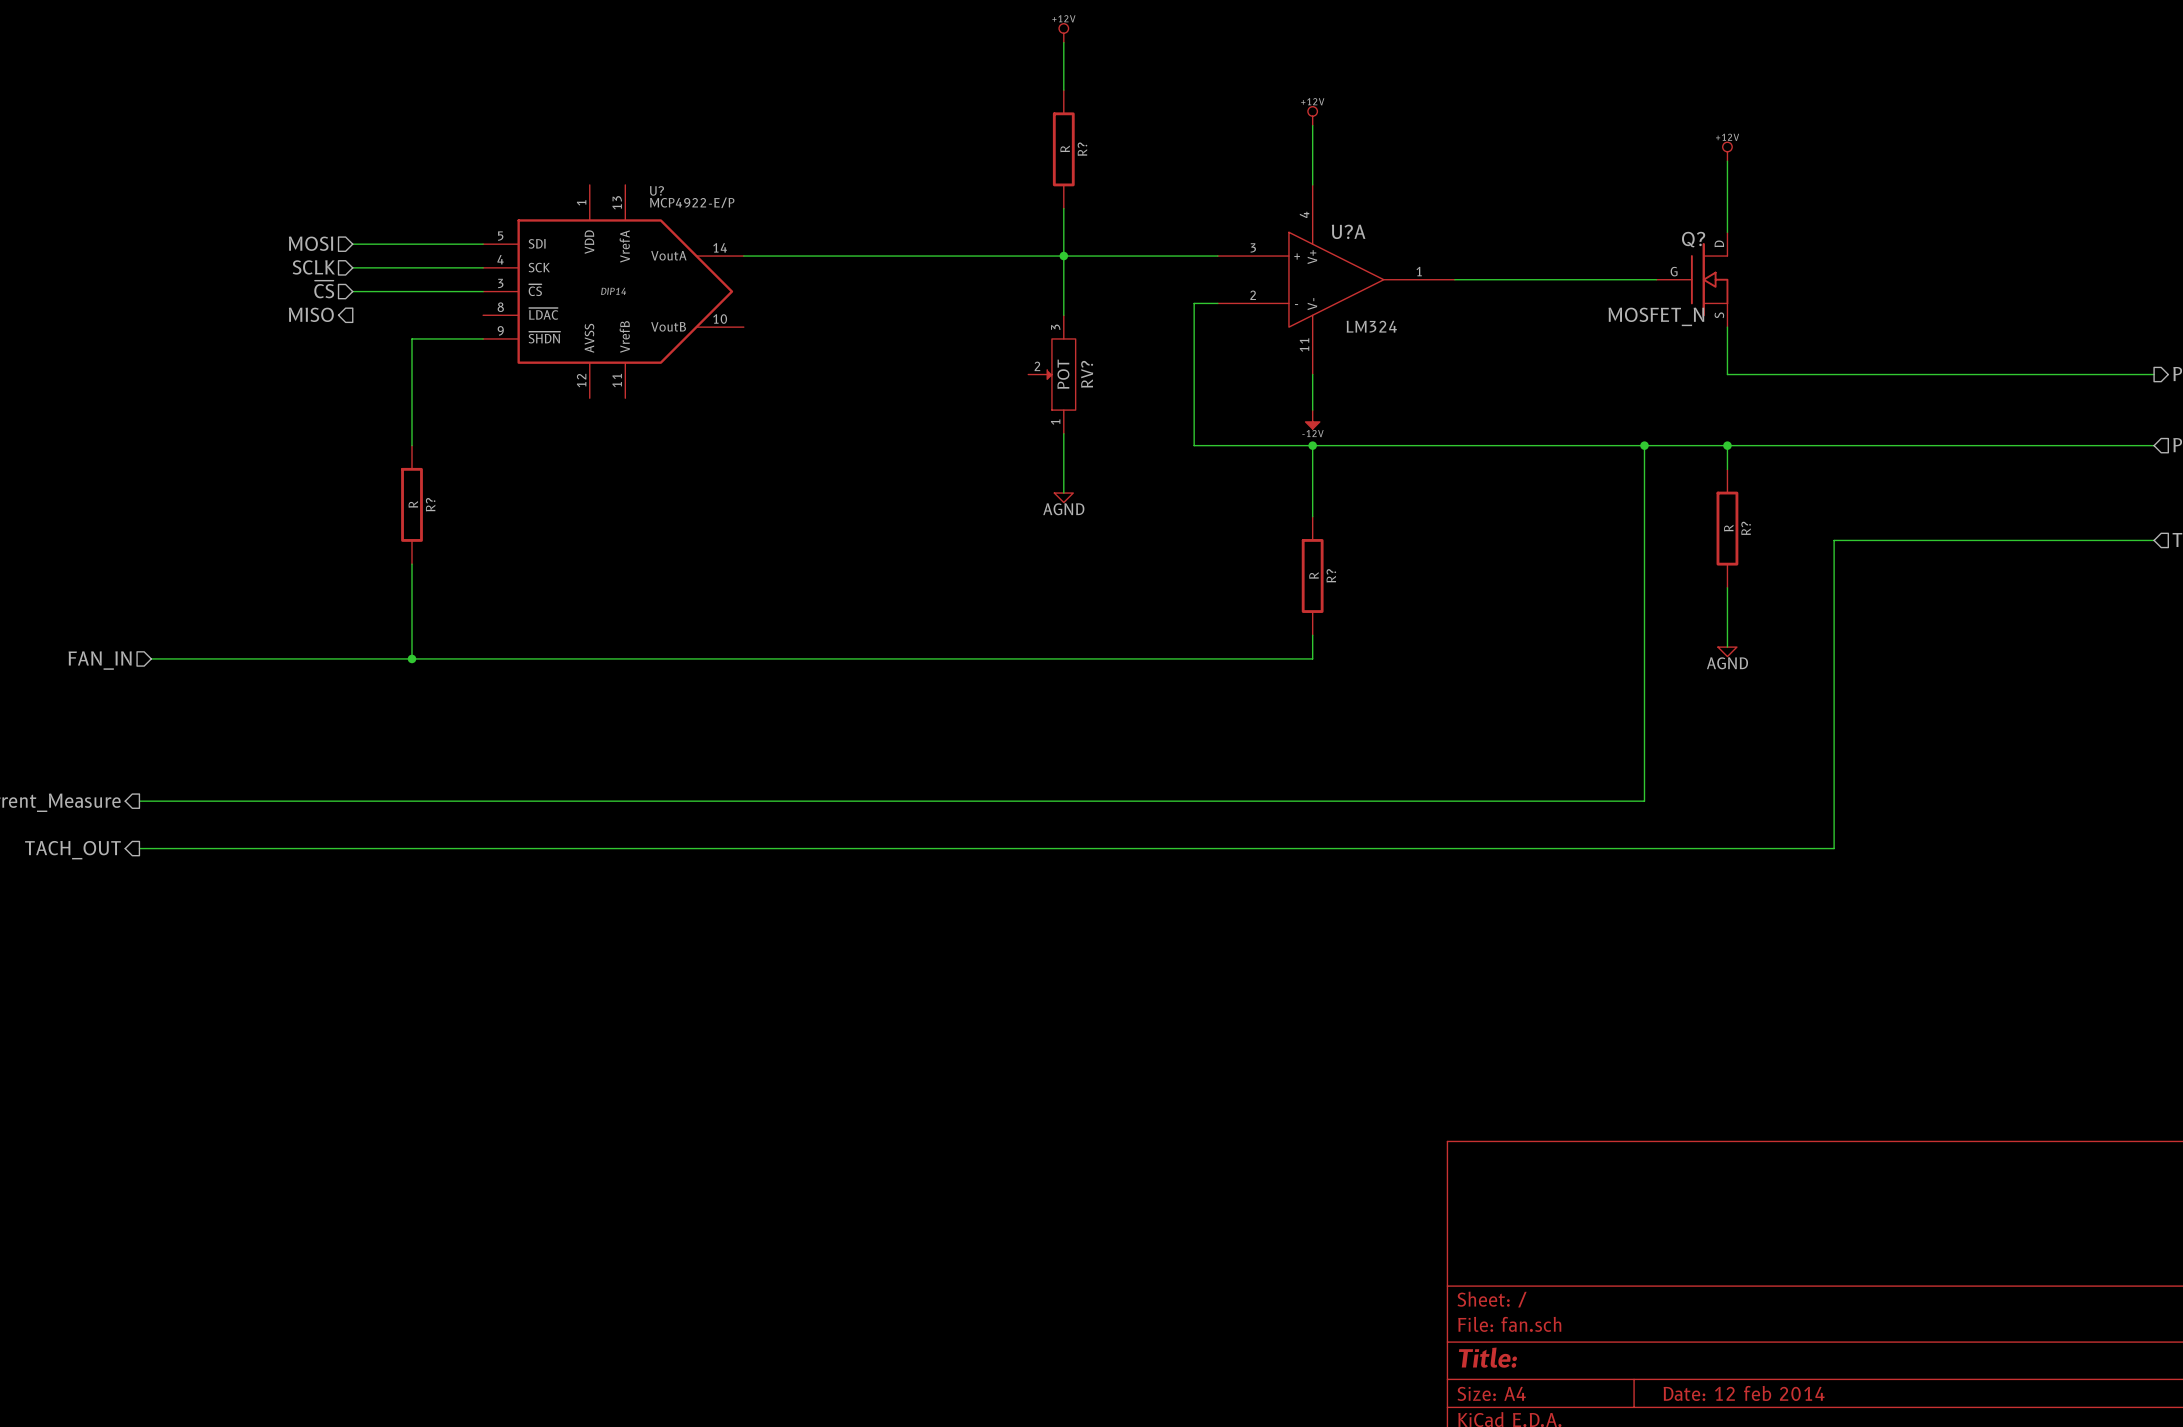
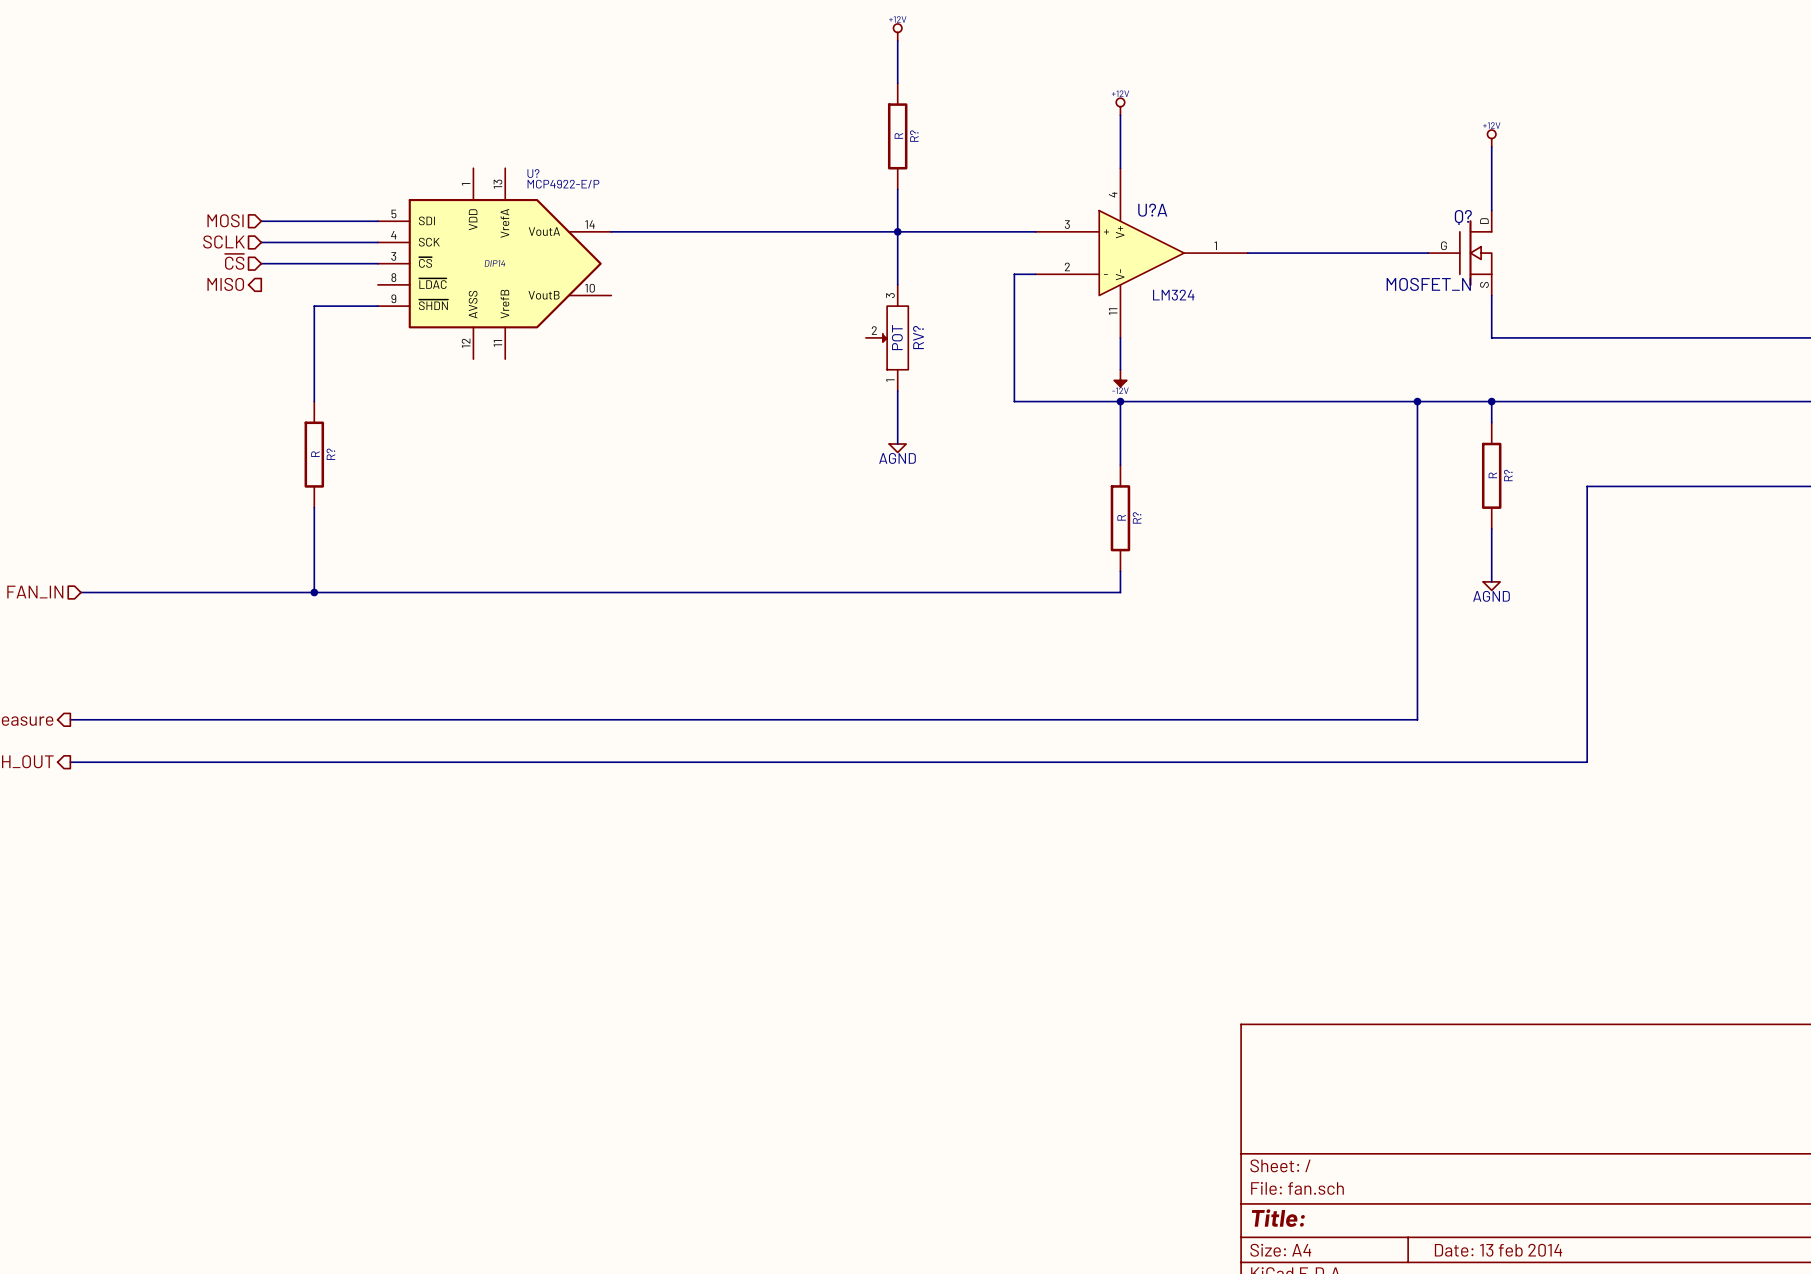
title block: Date: 12 feb 2014 (1744, 1393) -> Date: 13 feb 2014 (1498, 1250)

